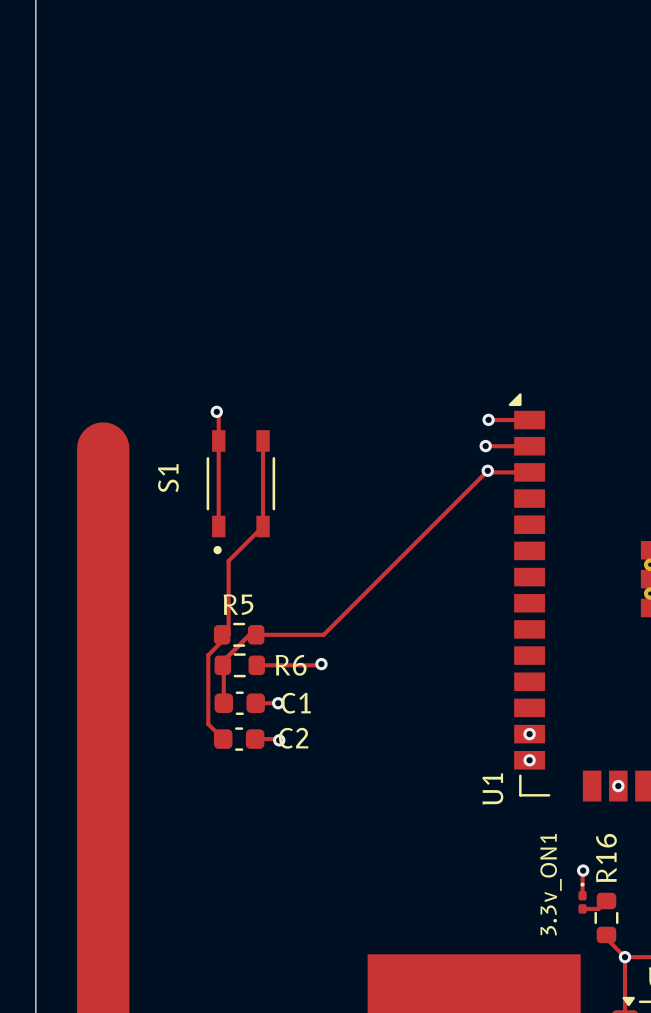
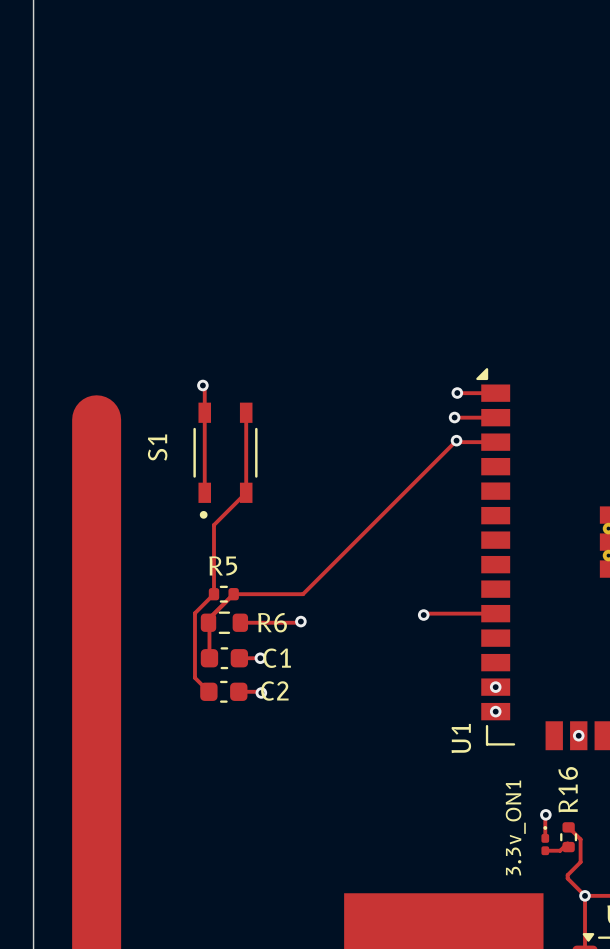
R5 footprint: [213, 622, 265, 647] -> [208, 585, 239, 603]
track: none -> (495, 613) (423, 615)
via: none -> (423, 615)
track: none -> (568, 827) (580, 839) (580, 862) (567, 875)
R16 footprint: [594, 892, 619, 944] -> [560, 822, 578, 853]

